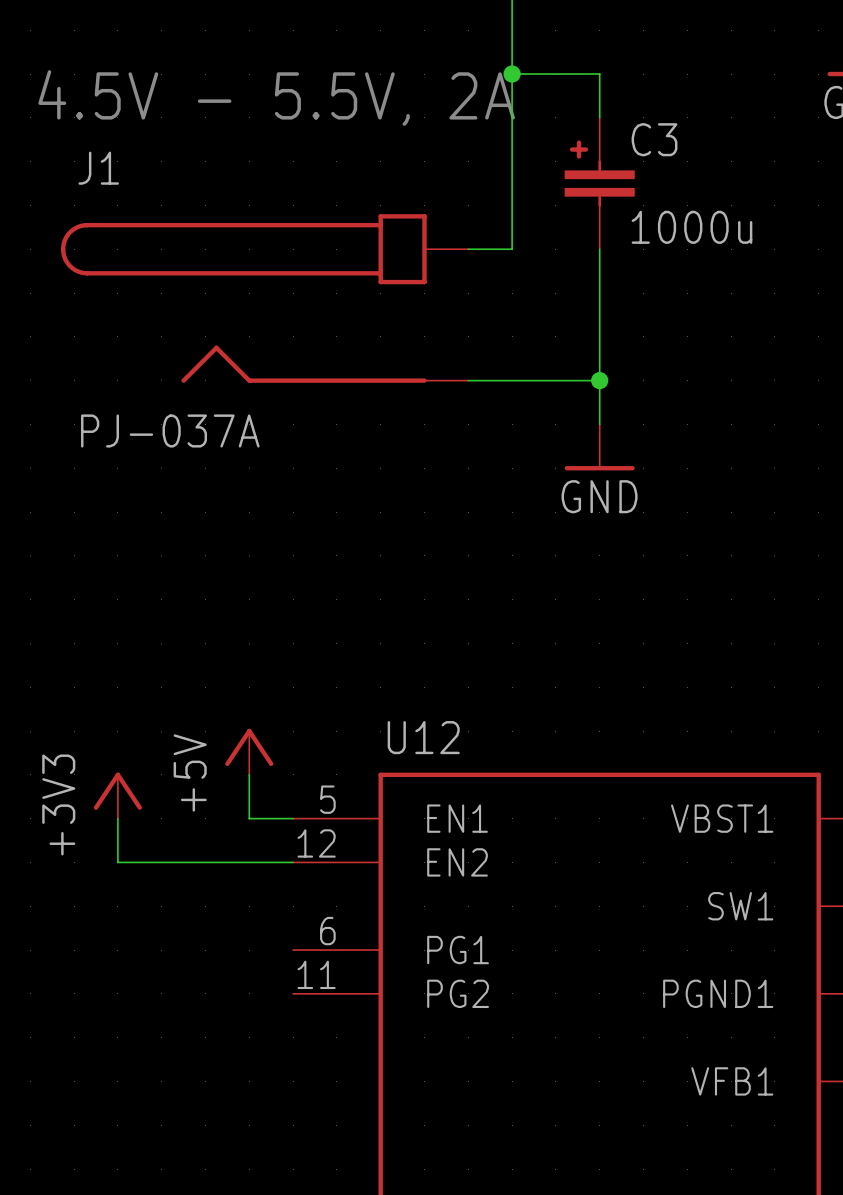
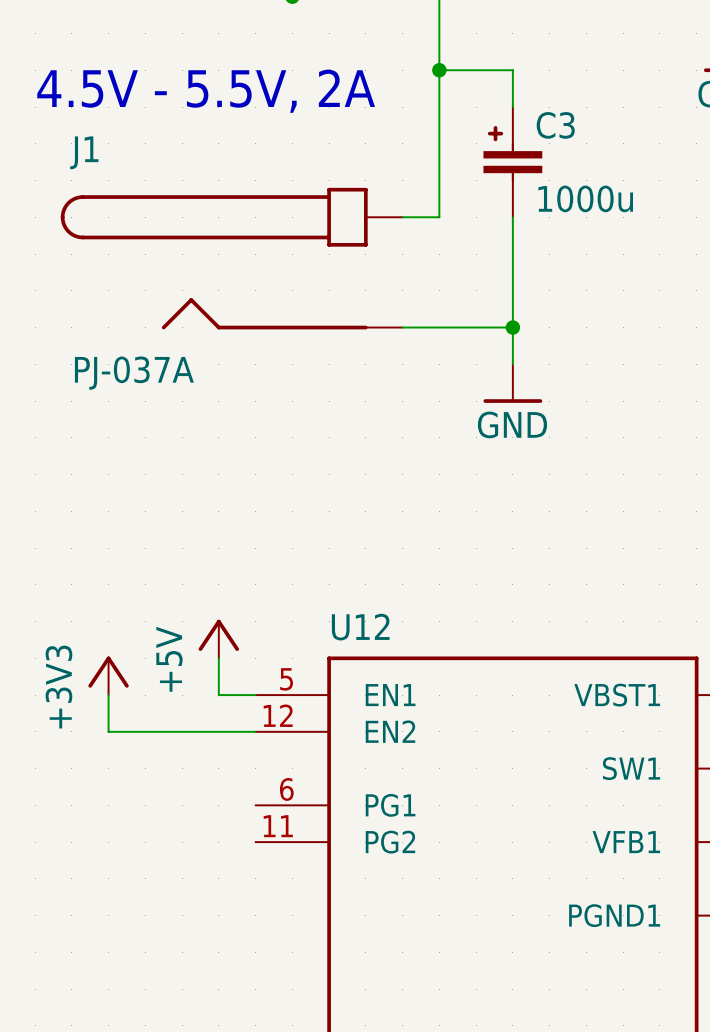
U12 pin name: PGND1 (718, 993) -> VFB1 (626, 842)
U12 pin name: VFB1 (732, 1081) -> PGND1 (614, 915)

